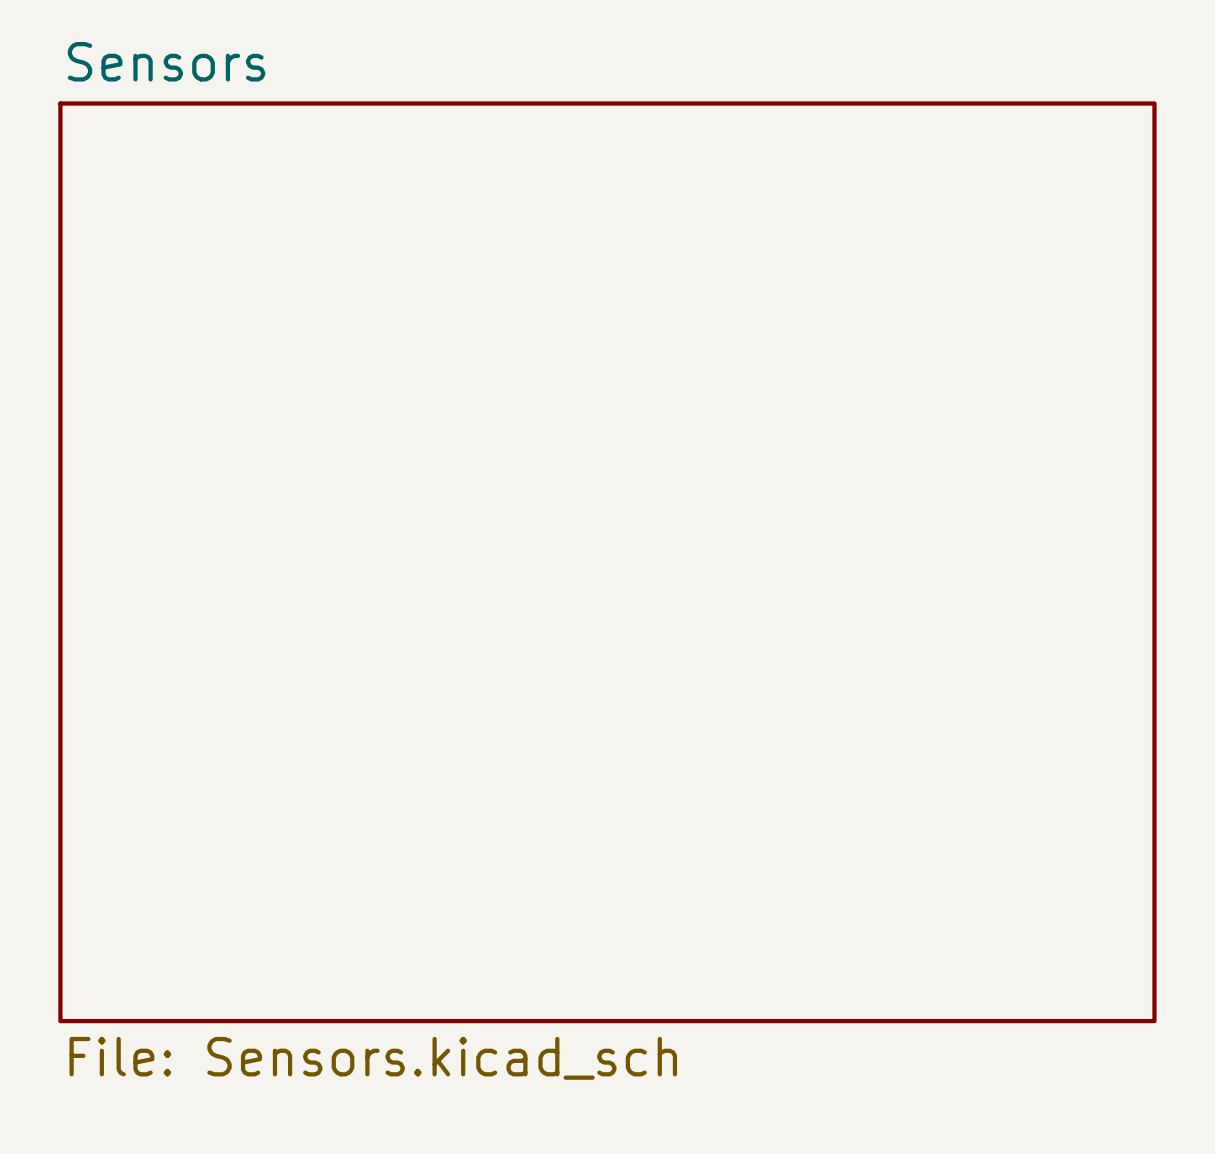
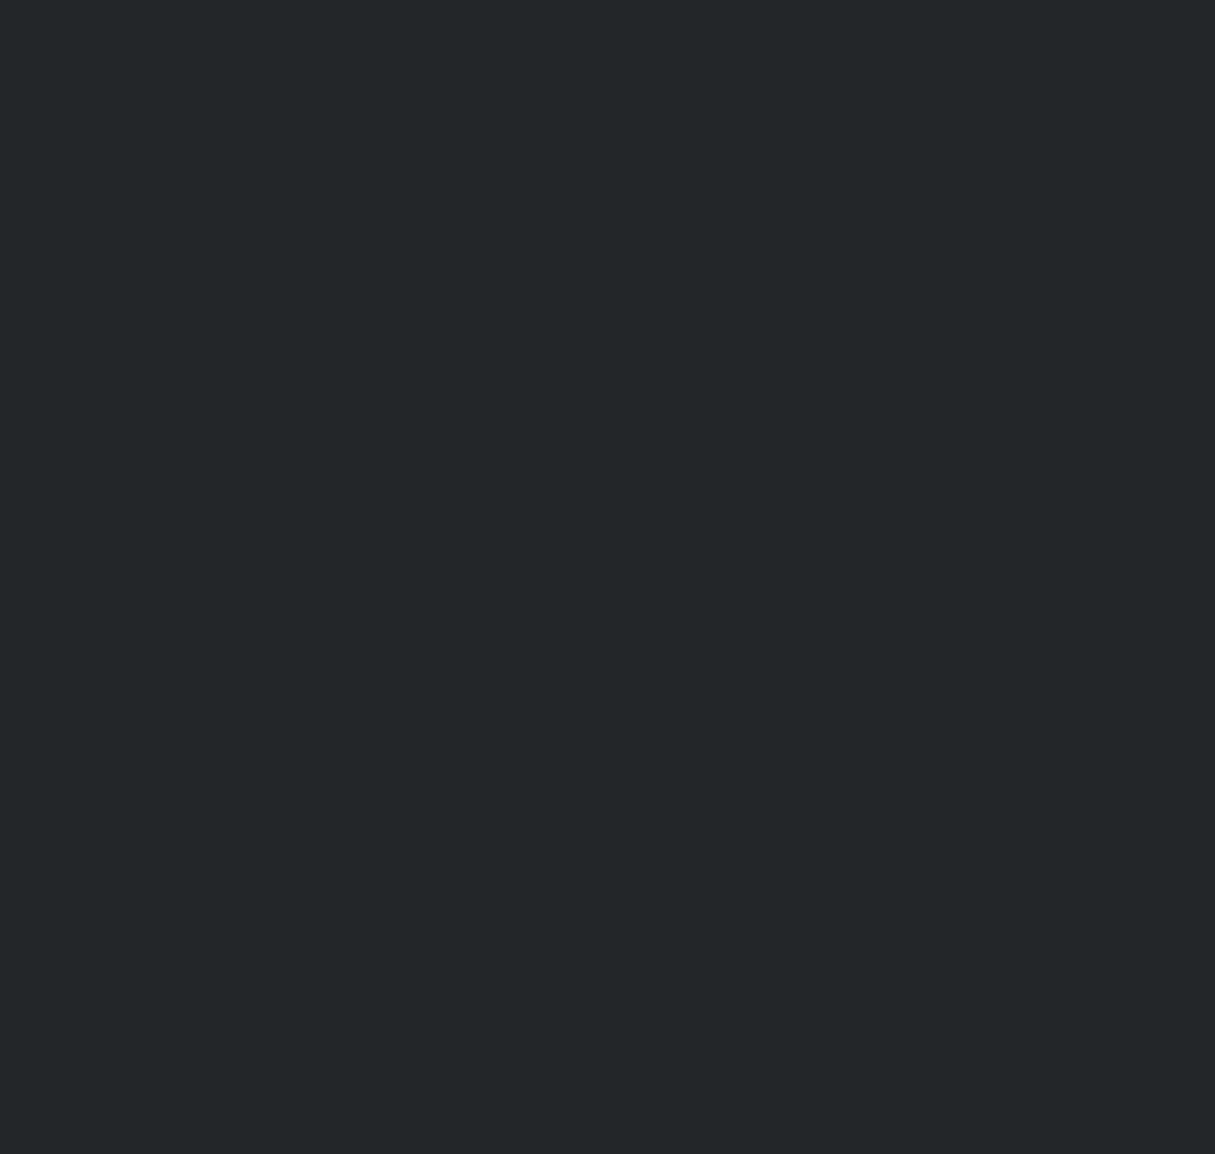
sheet Sensors: File: Sensors.kicad_sch (607, 562) -> none

